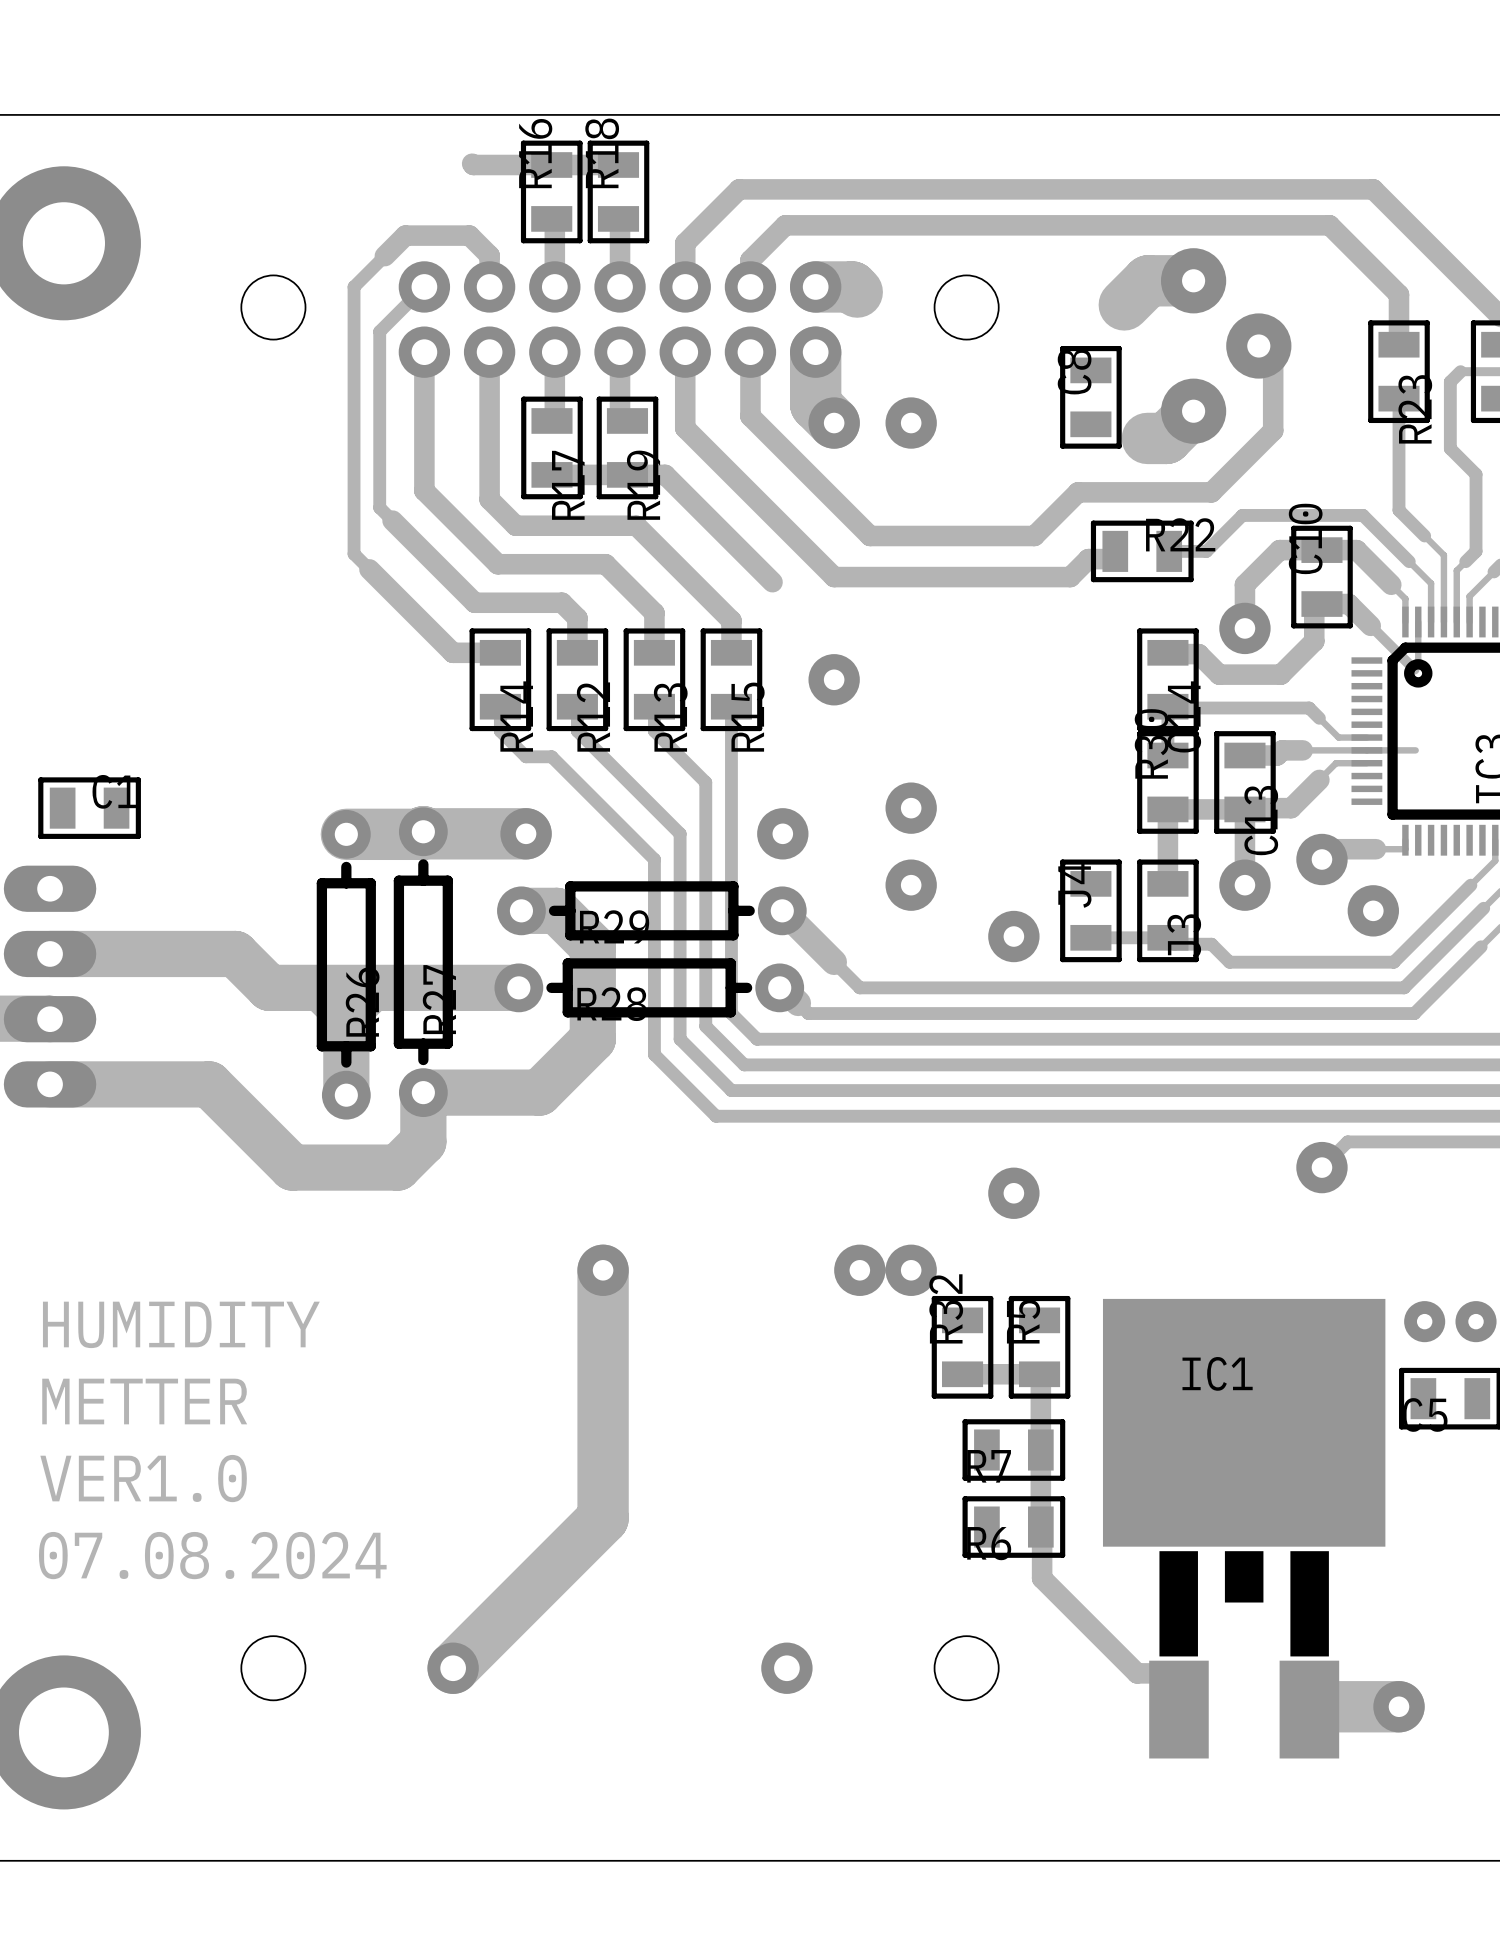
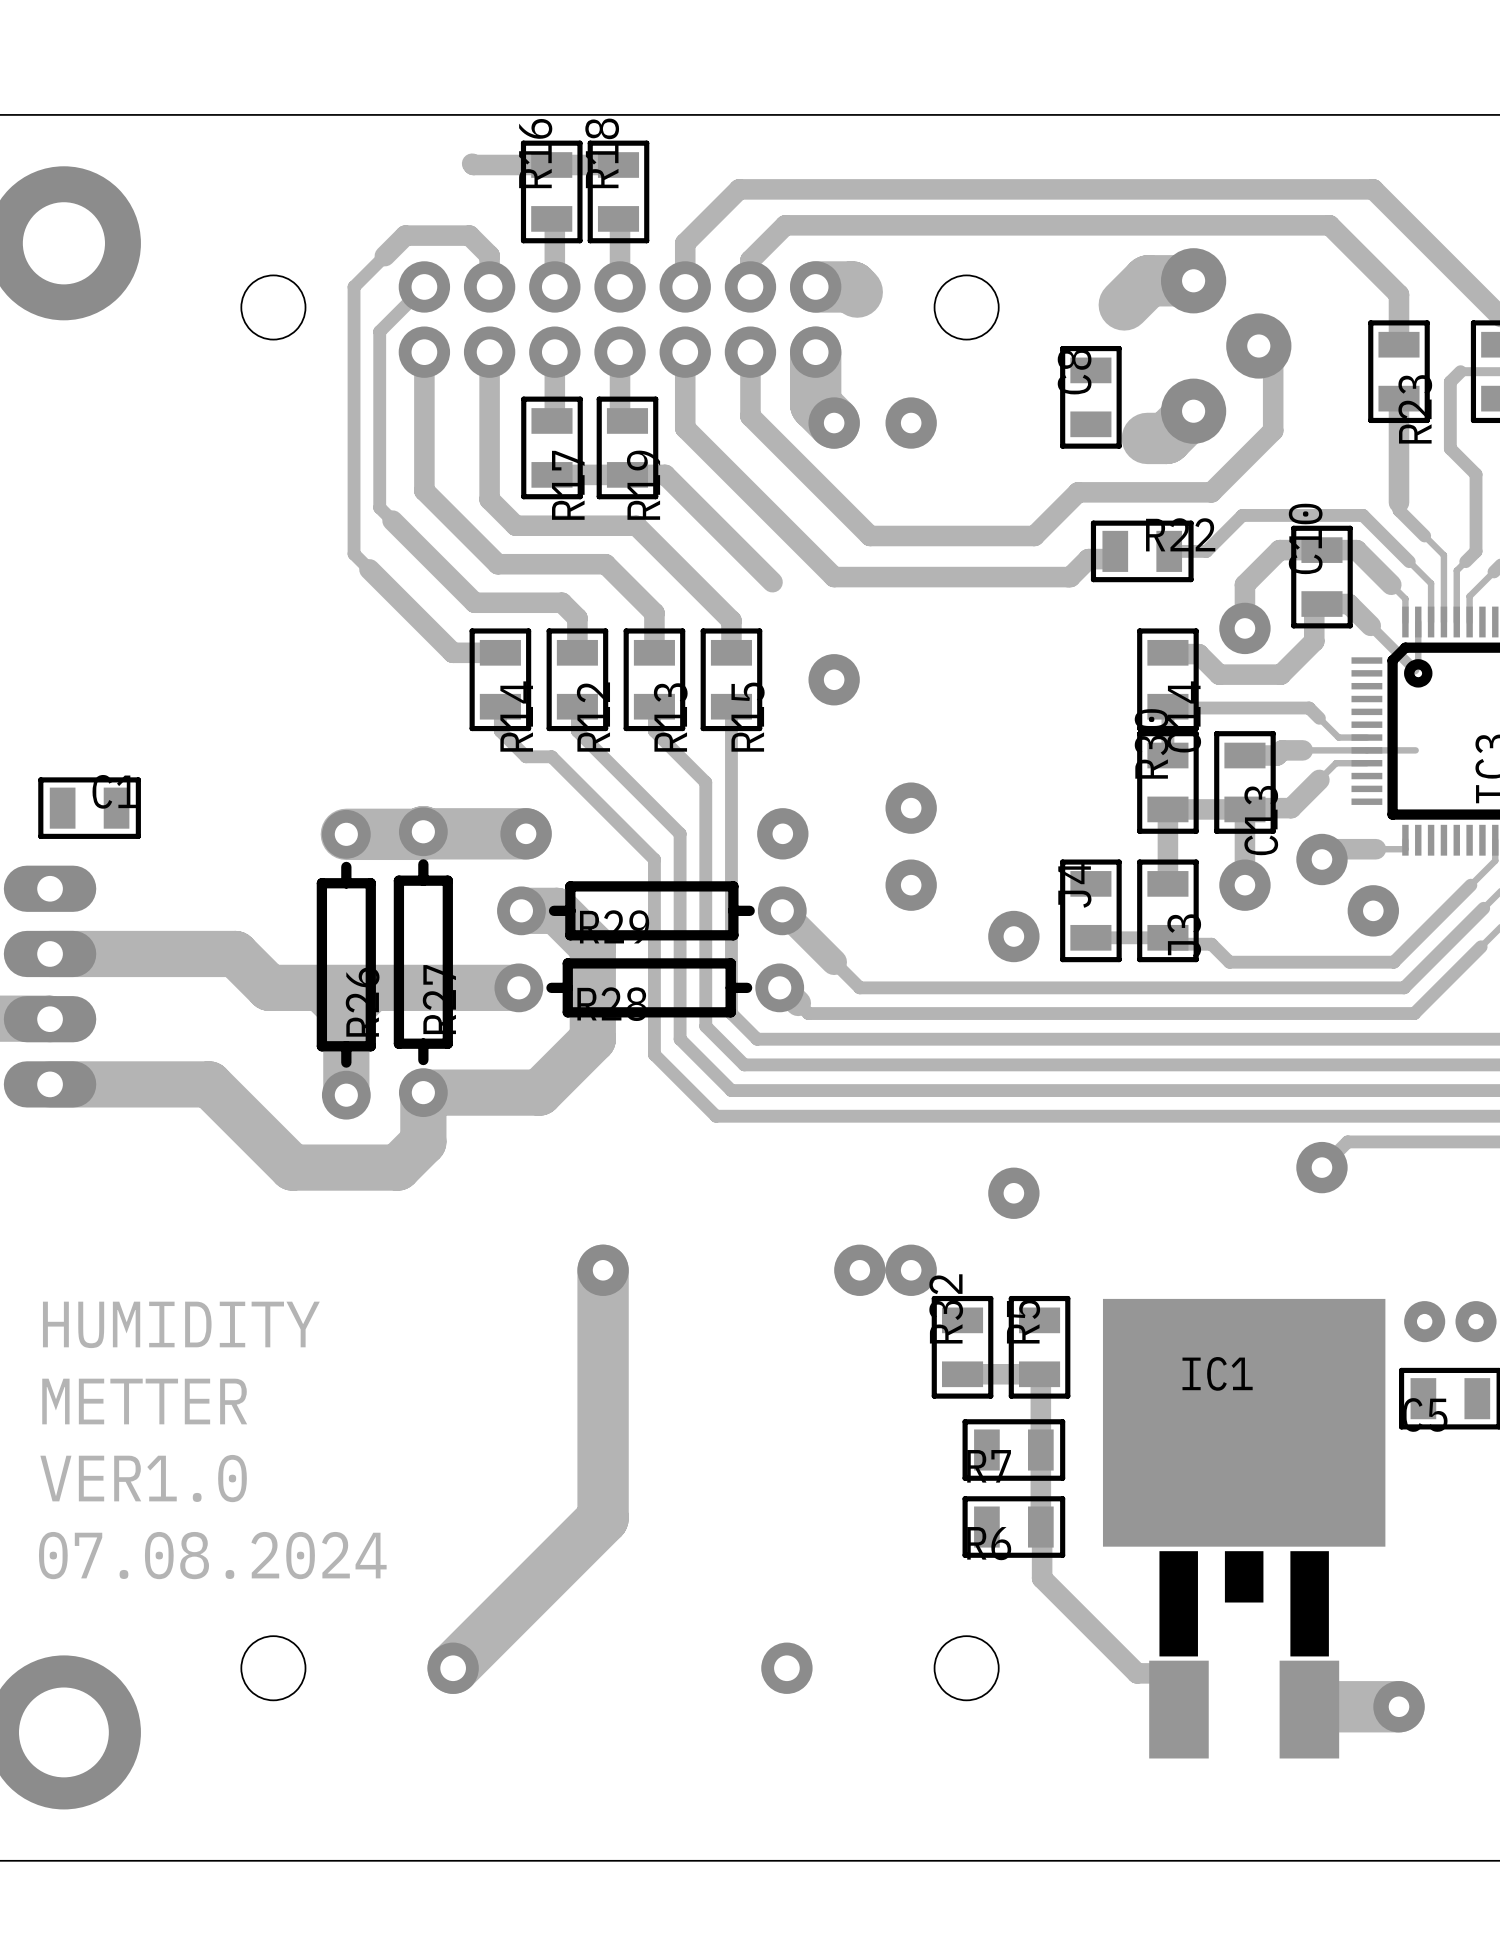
track width: thin (1398, 398) (1398, 502) -> thick (1398, 398) (1398, 502)

